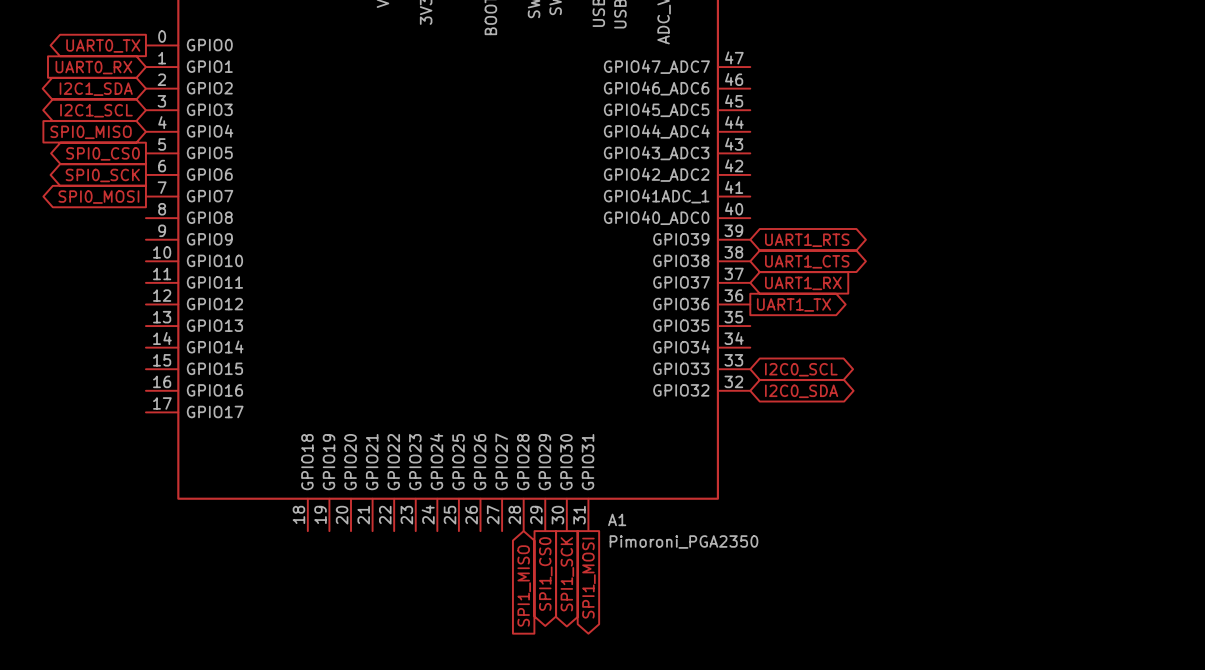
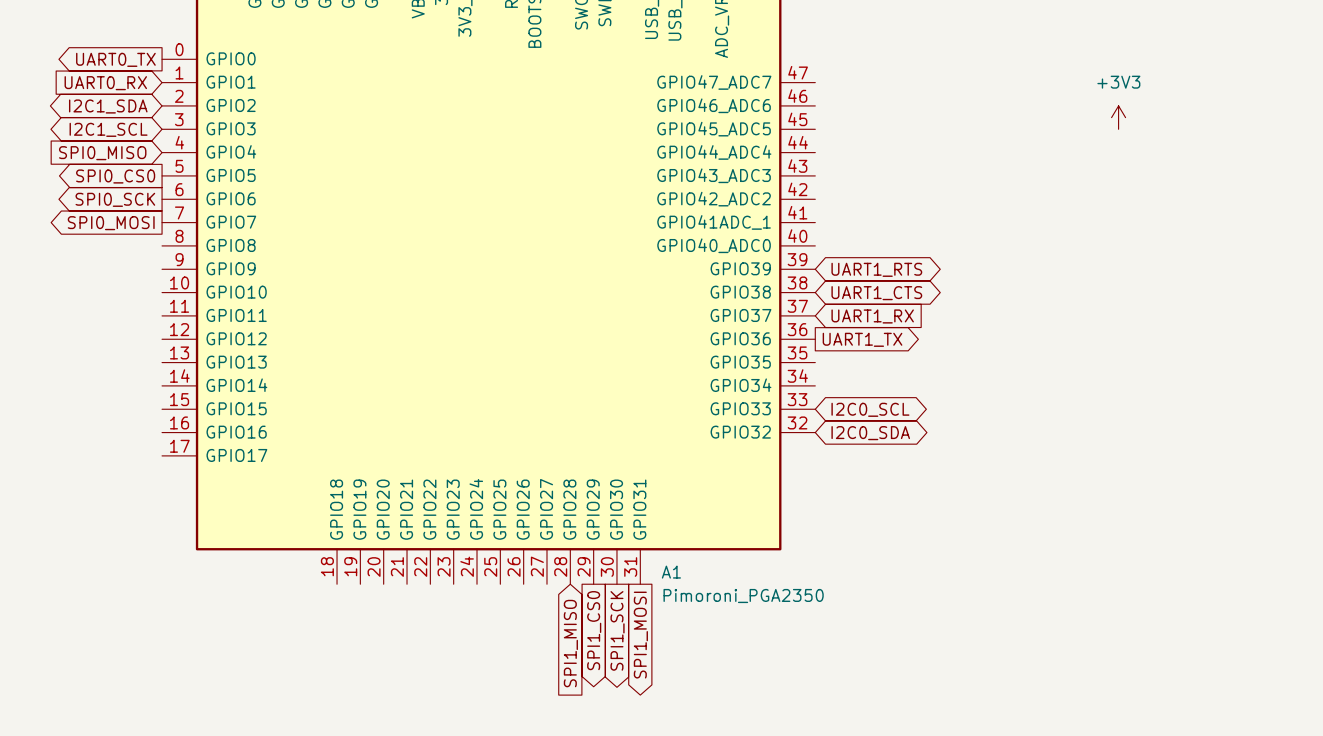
power symbol: none -> +3V3 (1118, 117)

